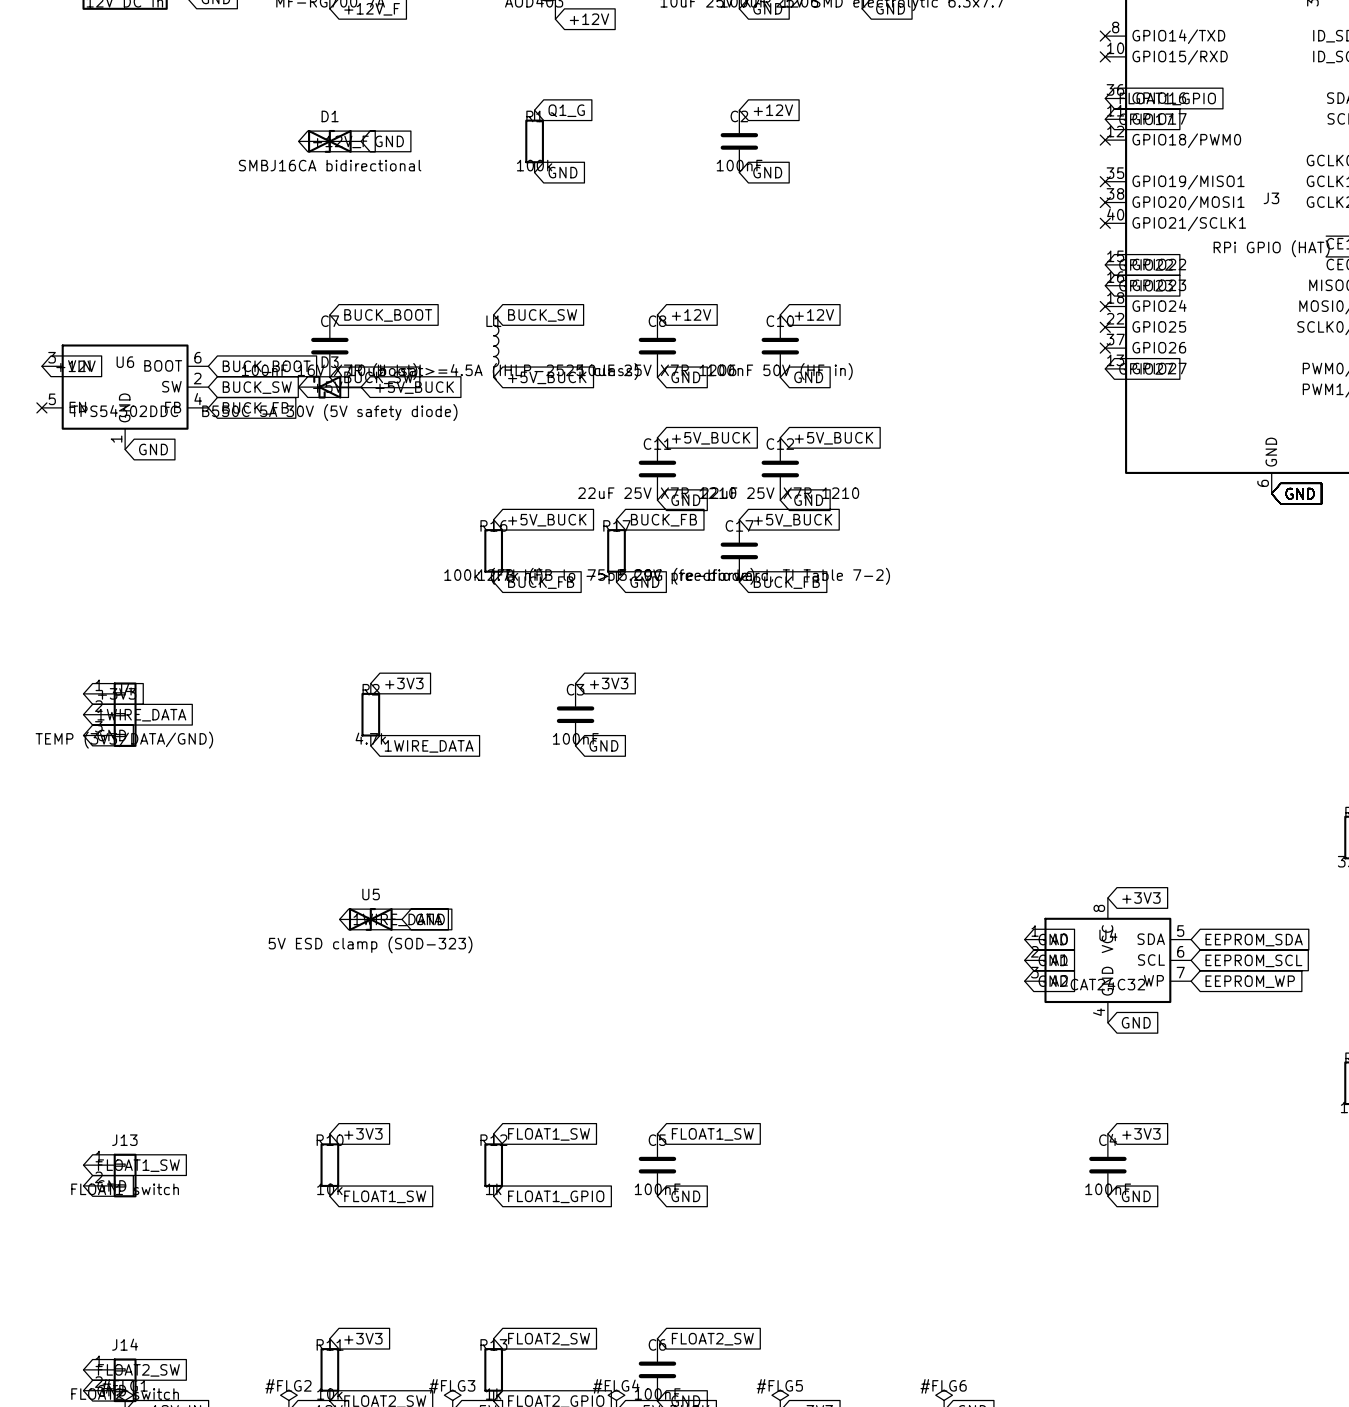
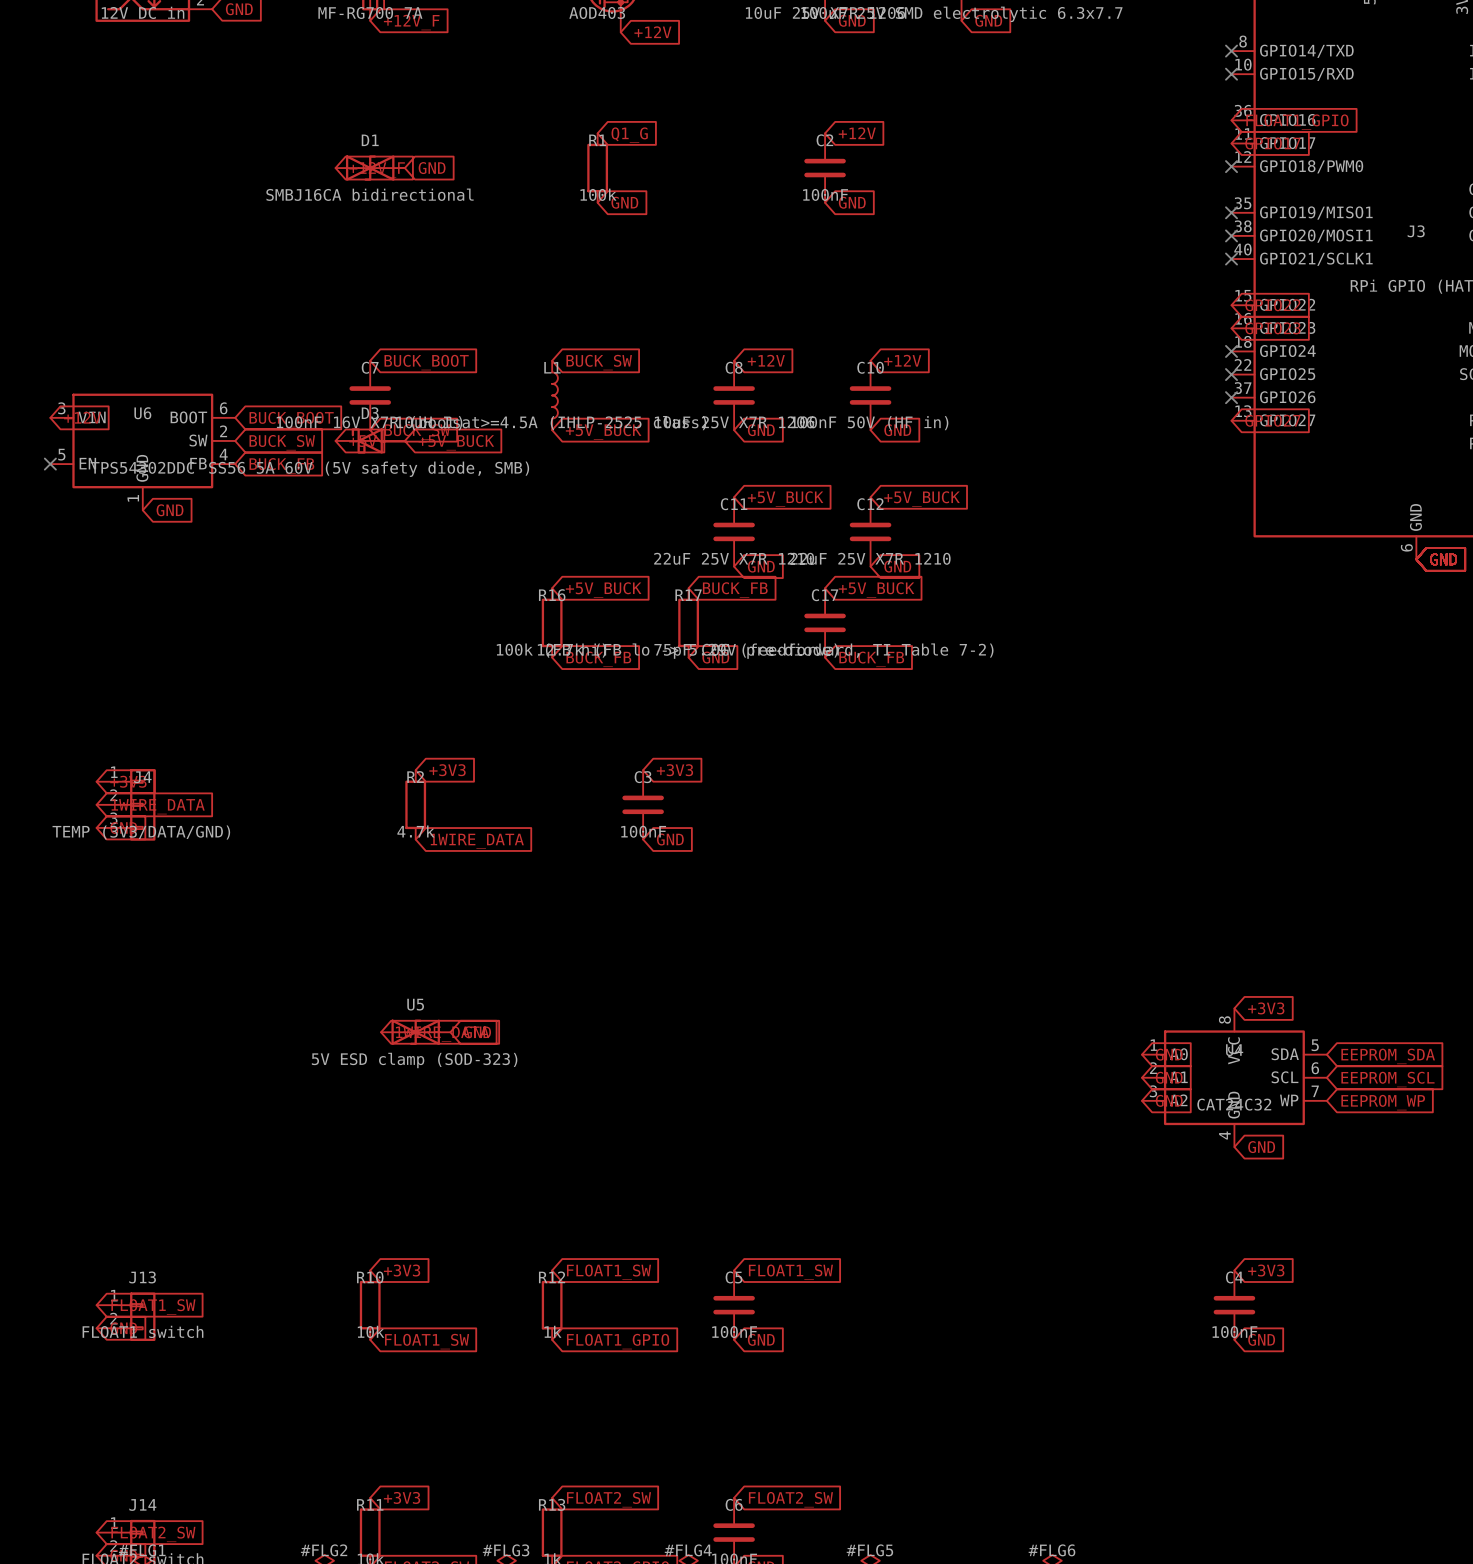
D3 value: B550C 5A 30V (5V safety diode) (329, 412) -> SS56 5A 60V (5V safety diode, SMB) (369, 469)

